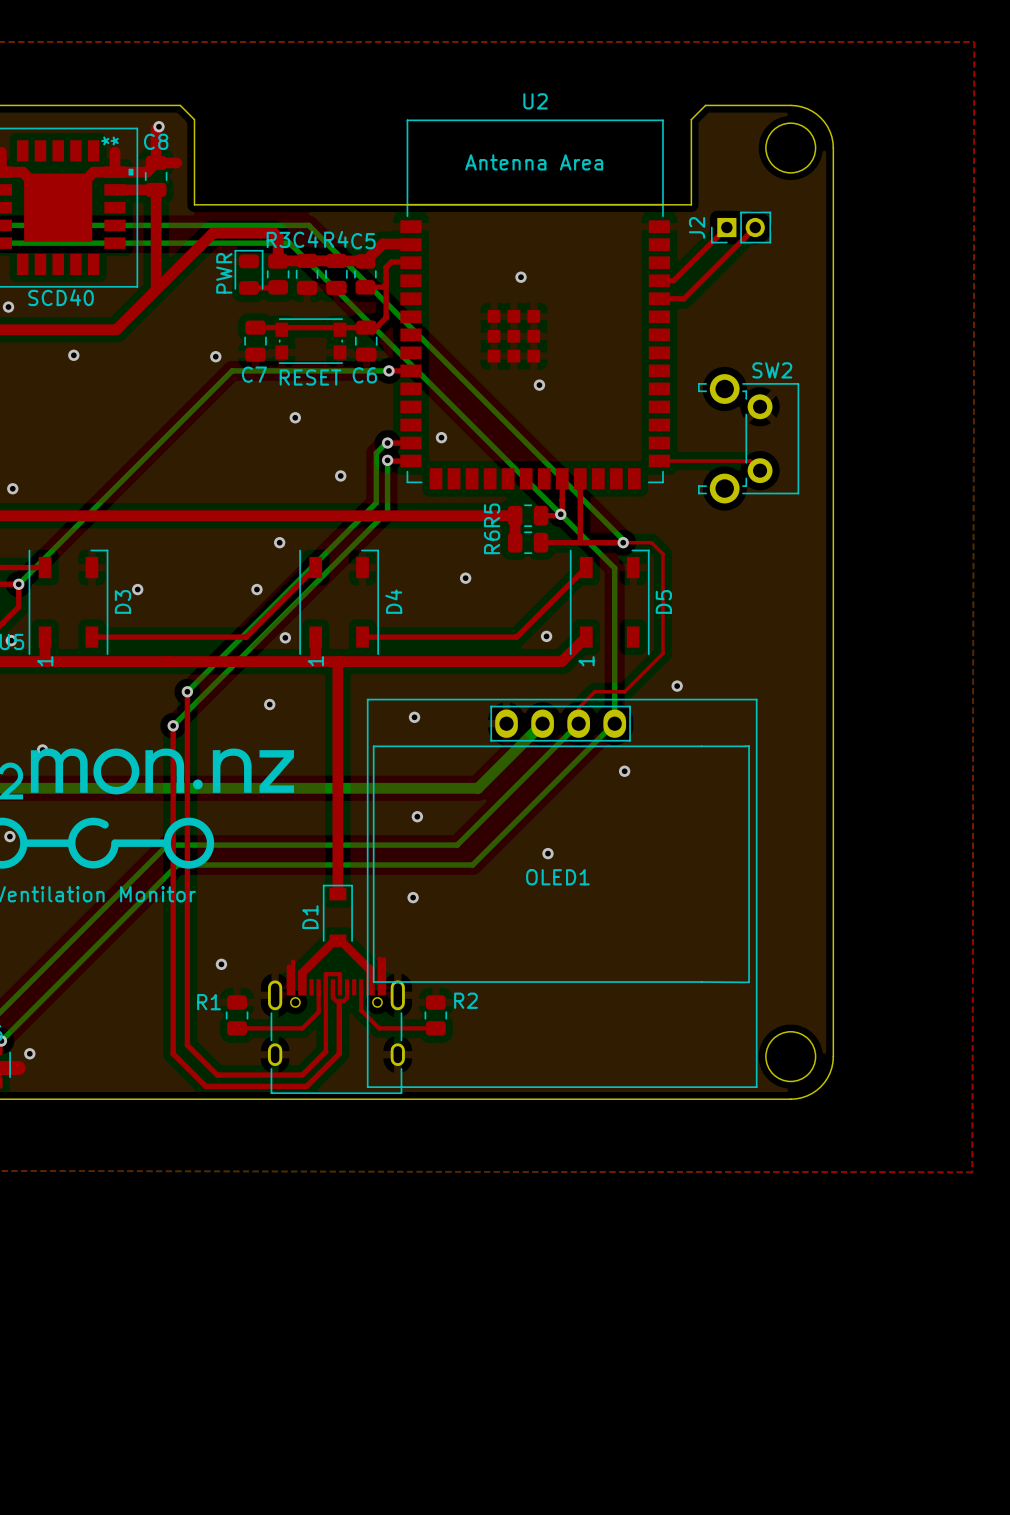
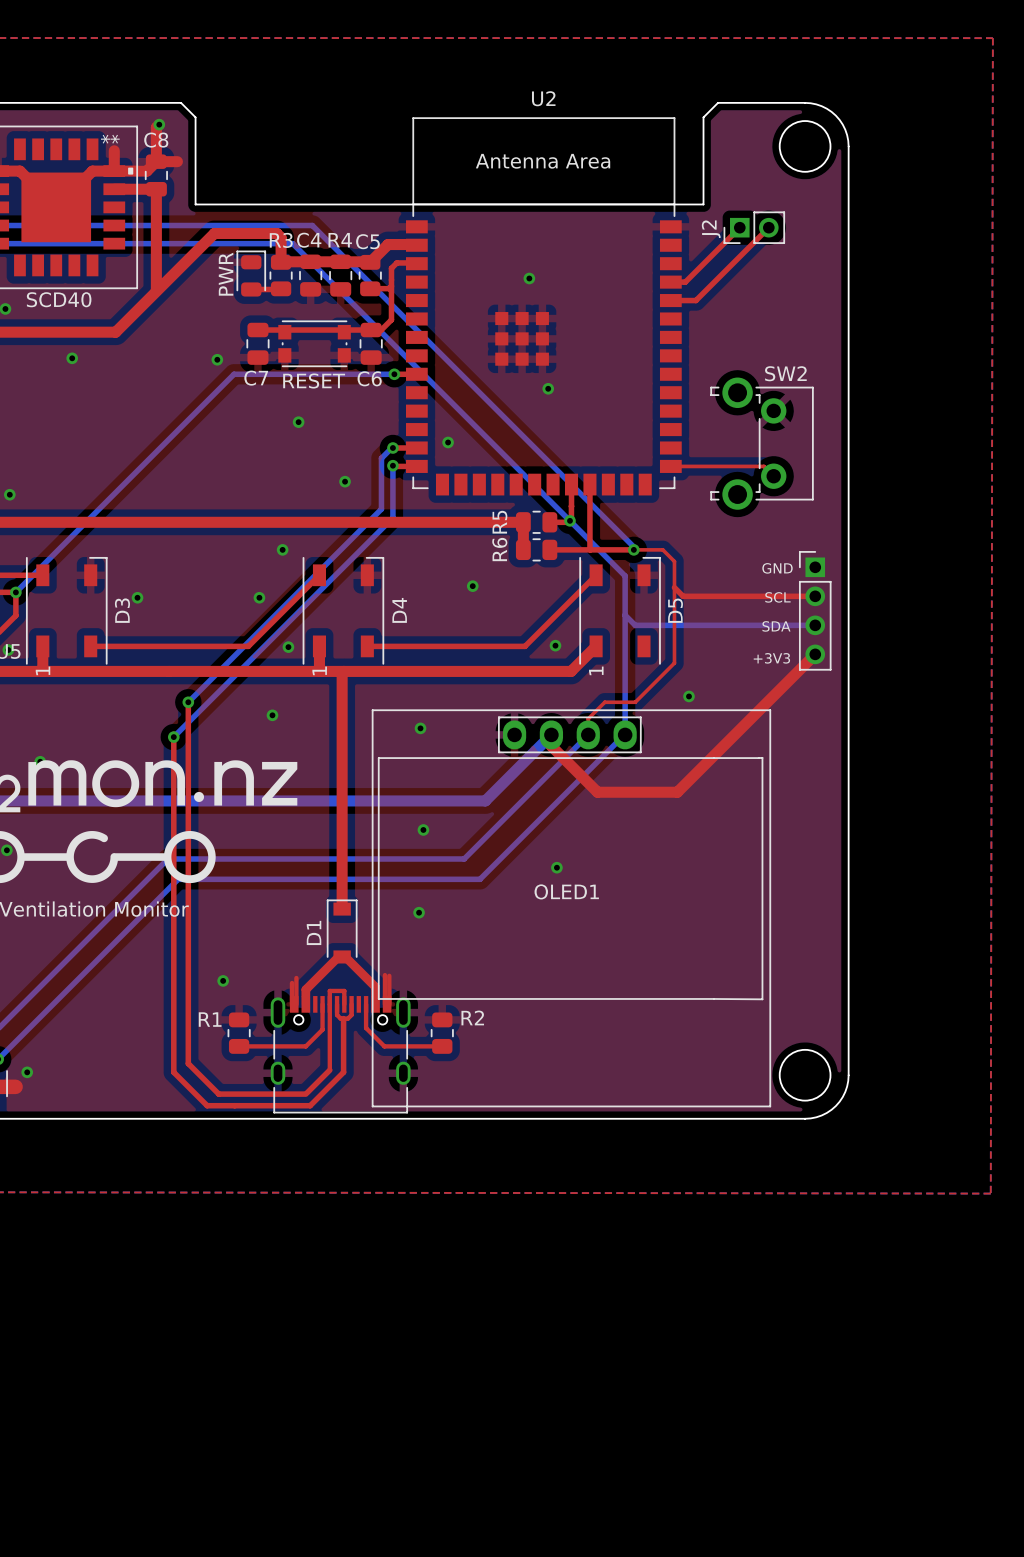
text: none -> GND (777, 568)
top track: none -> (674, 587) (683, 596) (815, 596)
text: none -> SCL (777, 597)
part: none -> (815, 610)
bottom track: none -> (625, 615) (635, 625) (815, 625)
text: none -> SDA (776, 626)
top track: none -> (815, 654) (677, 792) (597, 792) (551, 746) (551, 734)
text: none -> +3V3 (771, 658)
via: (624, 771) -> none

